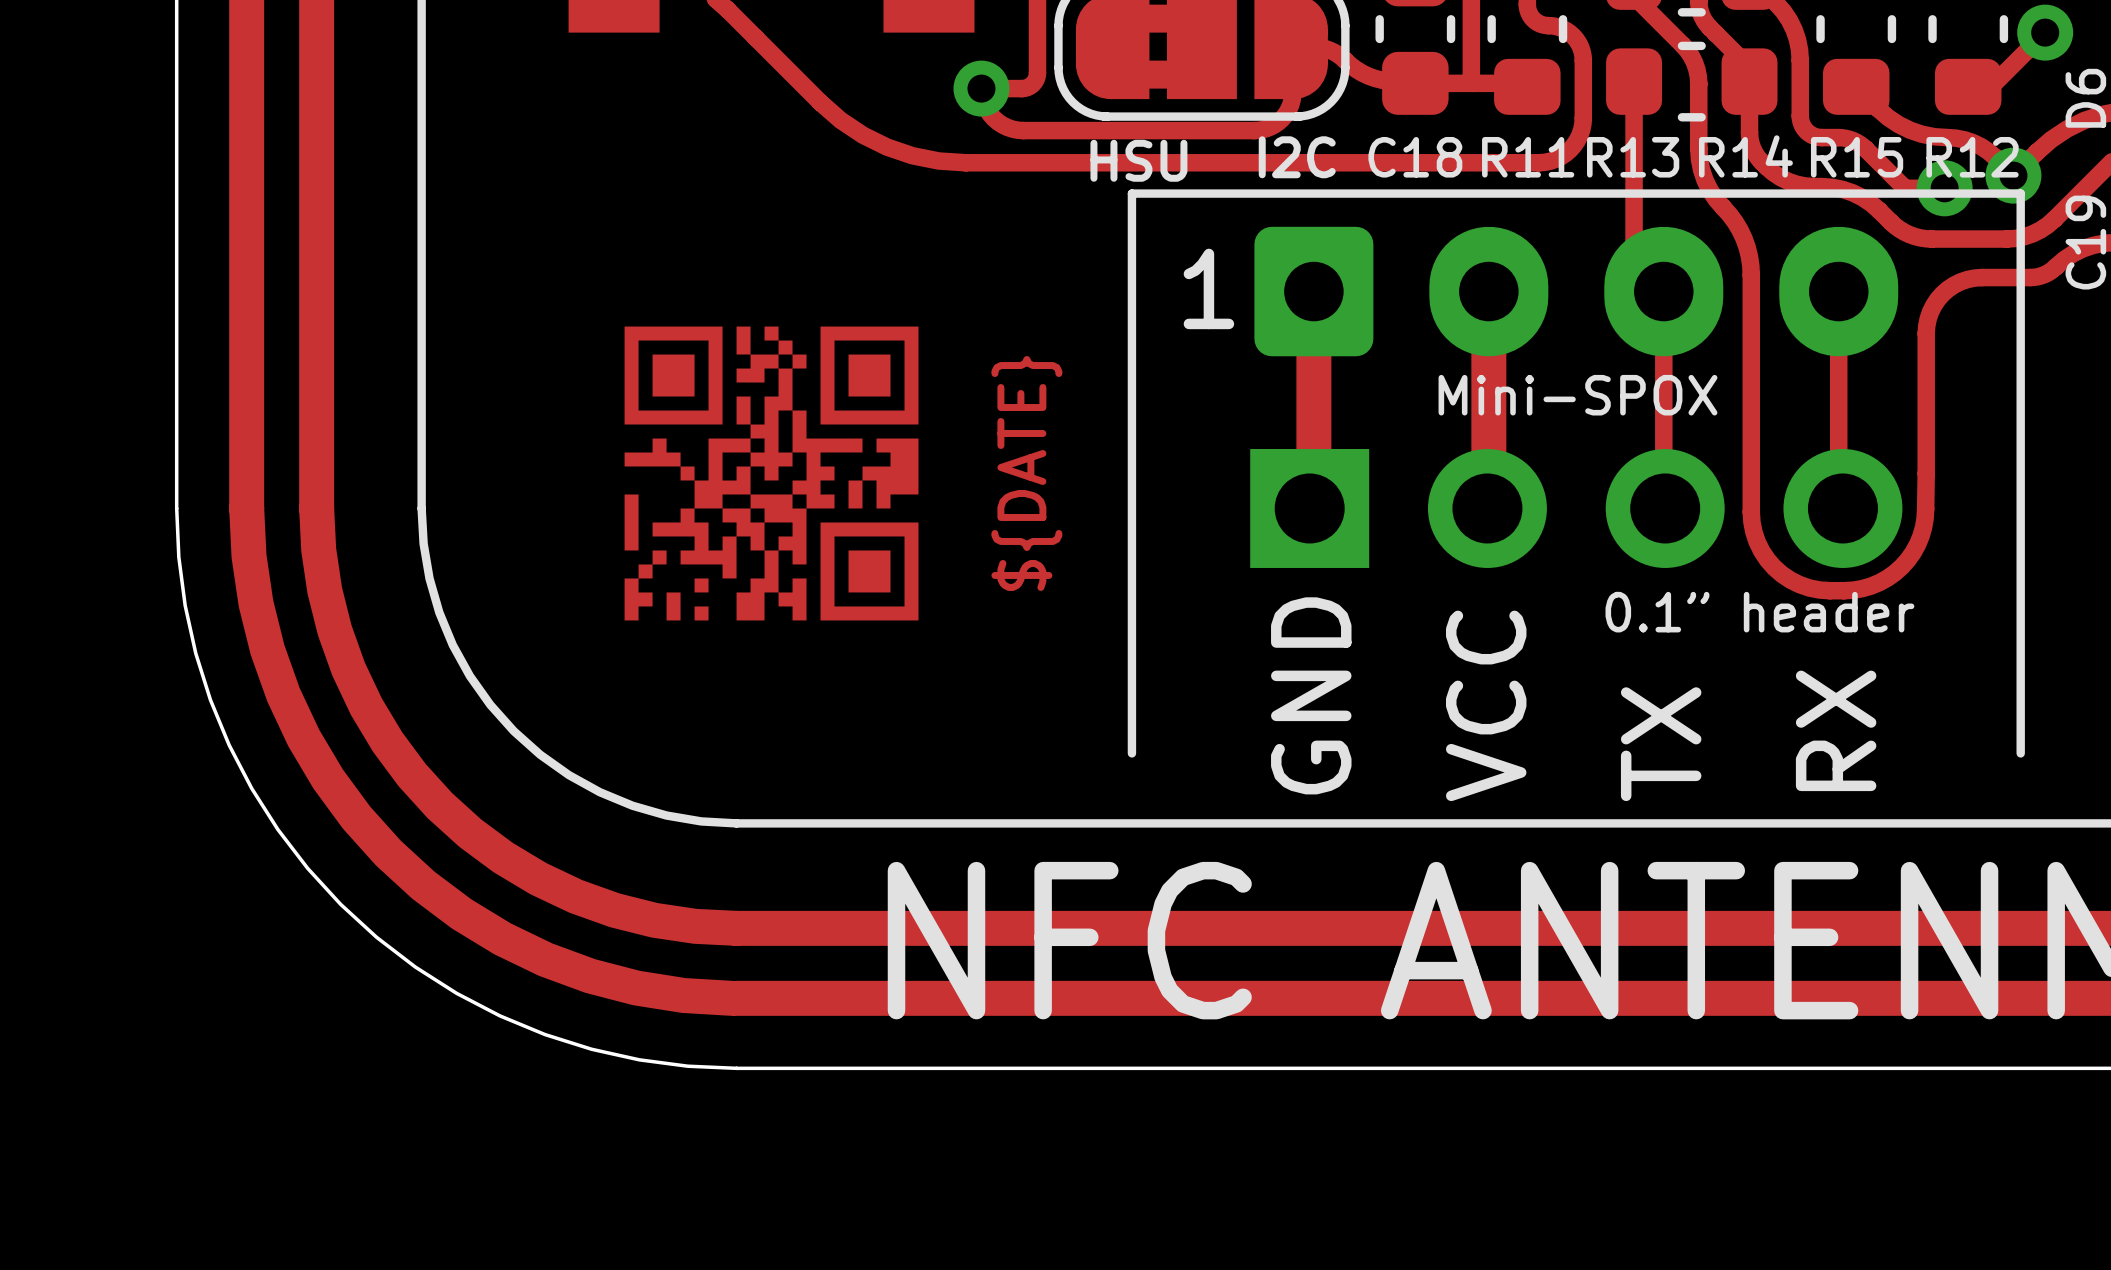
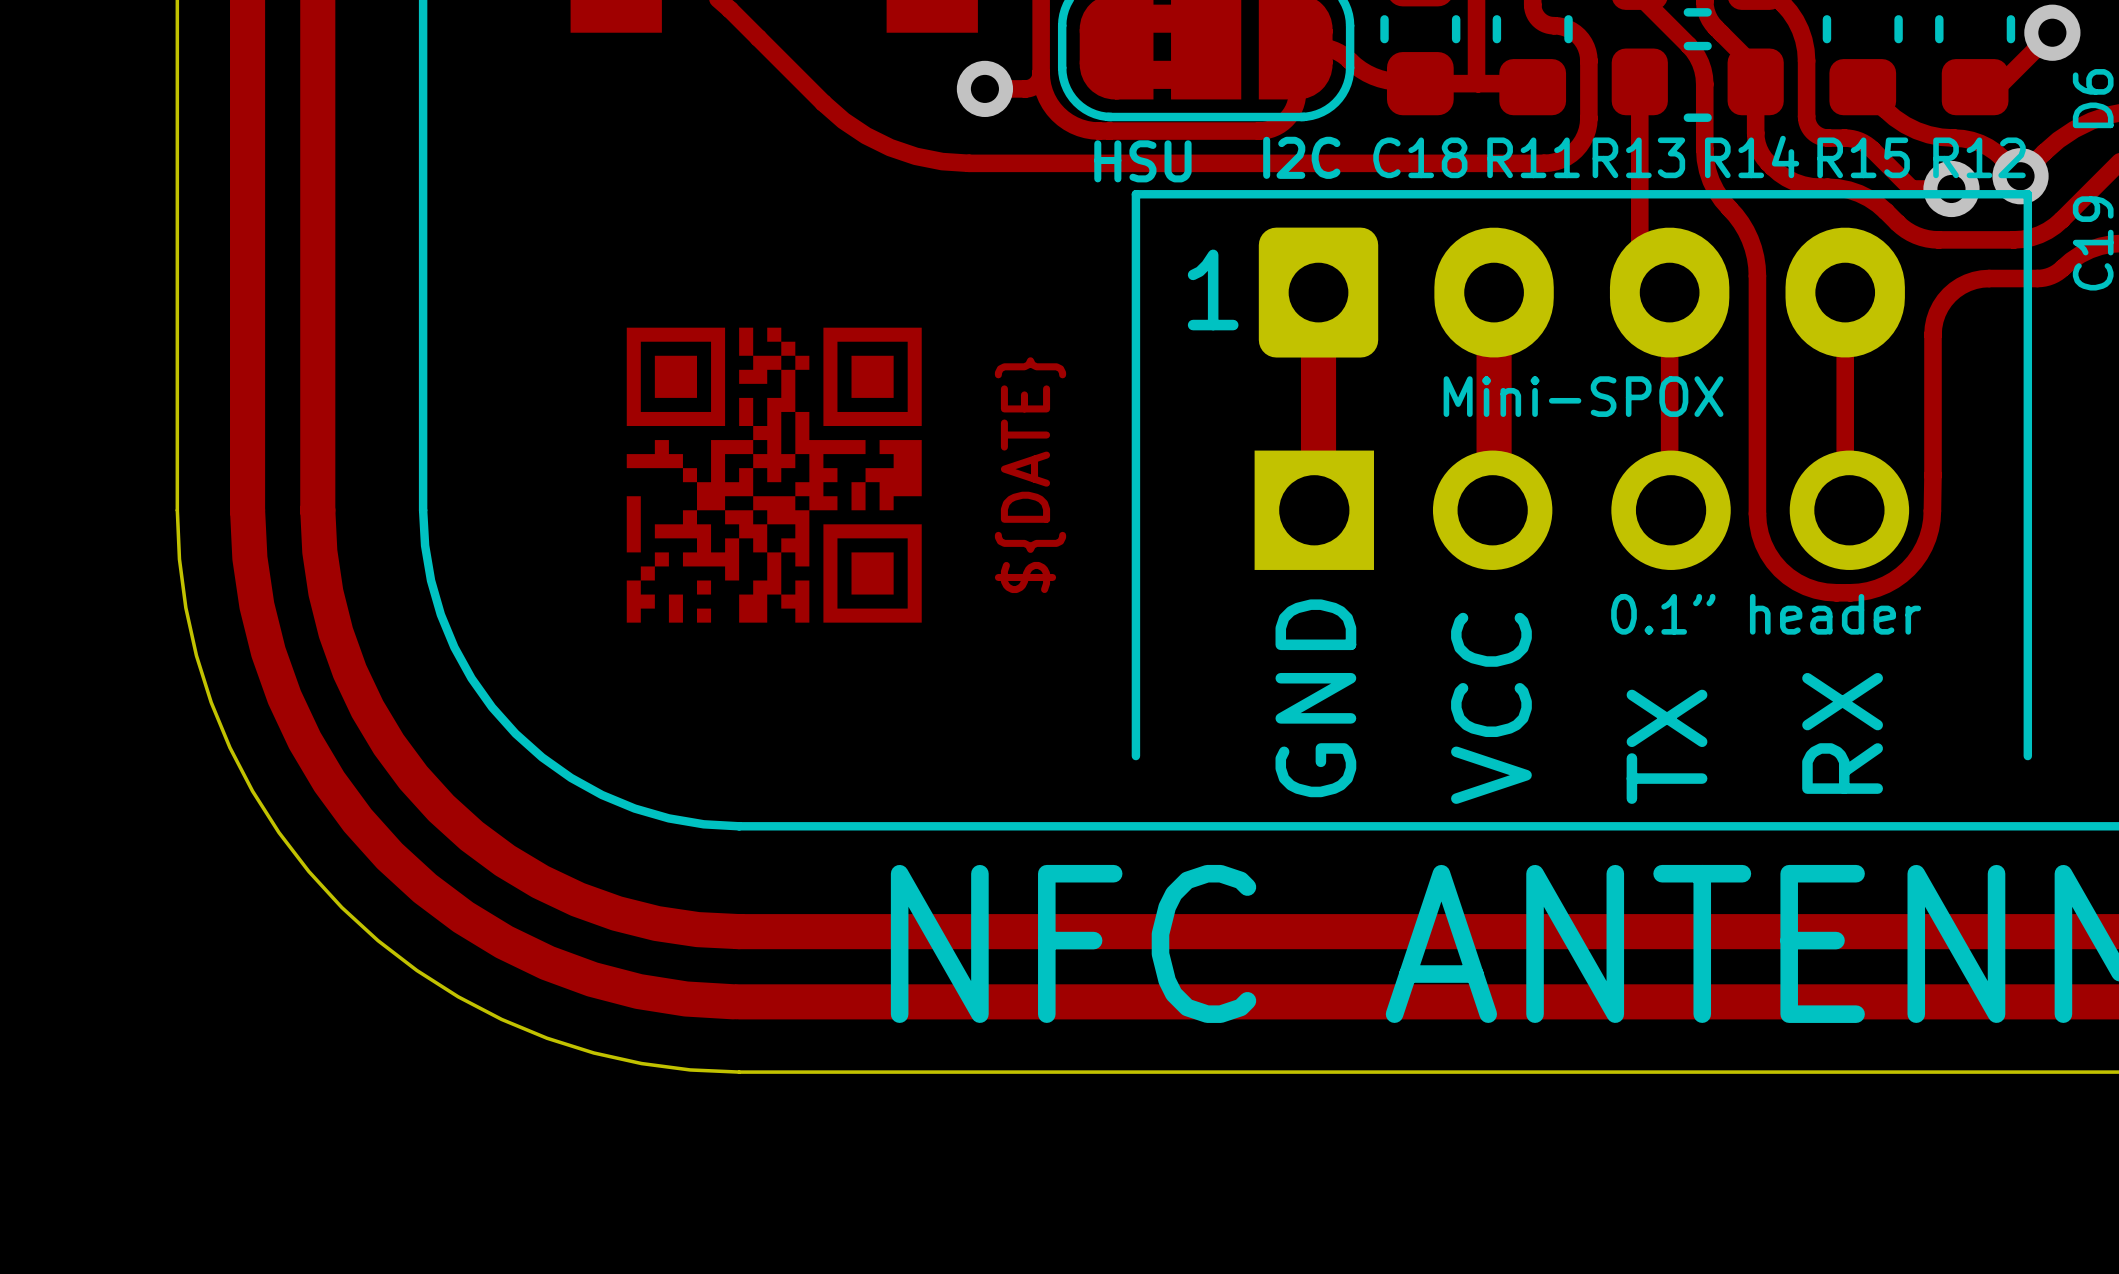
track: (981, 88) (987, 109) (997, 121) (1007, 127) (1023, 130) (1095, 130) -> (1041, 73) (1044, 92) (1058, 114) (1079, 127) (1099, 131)

